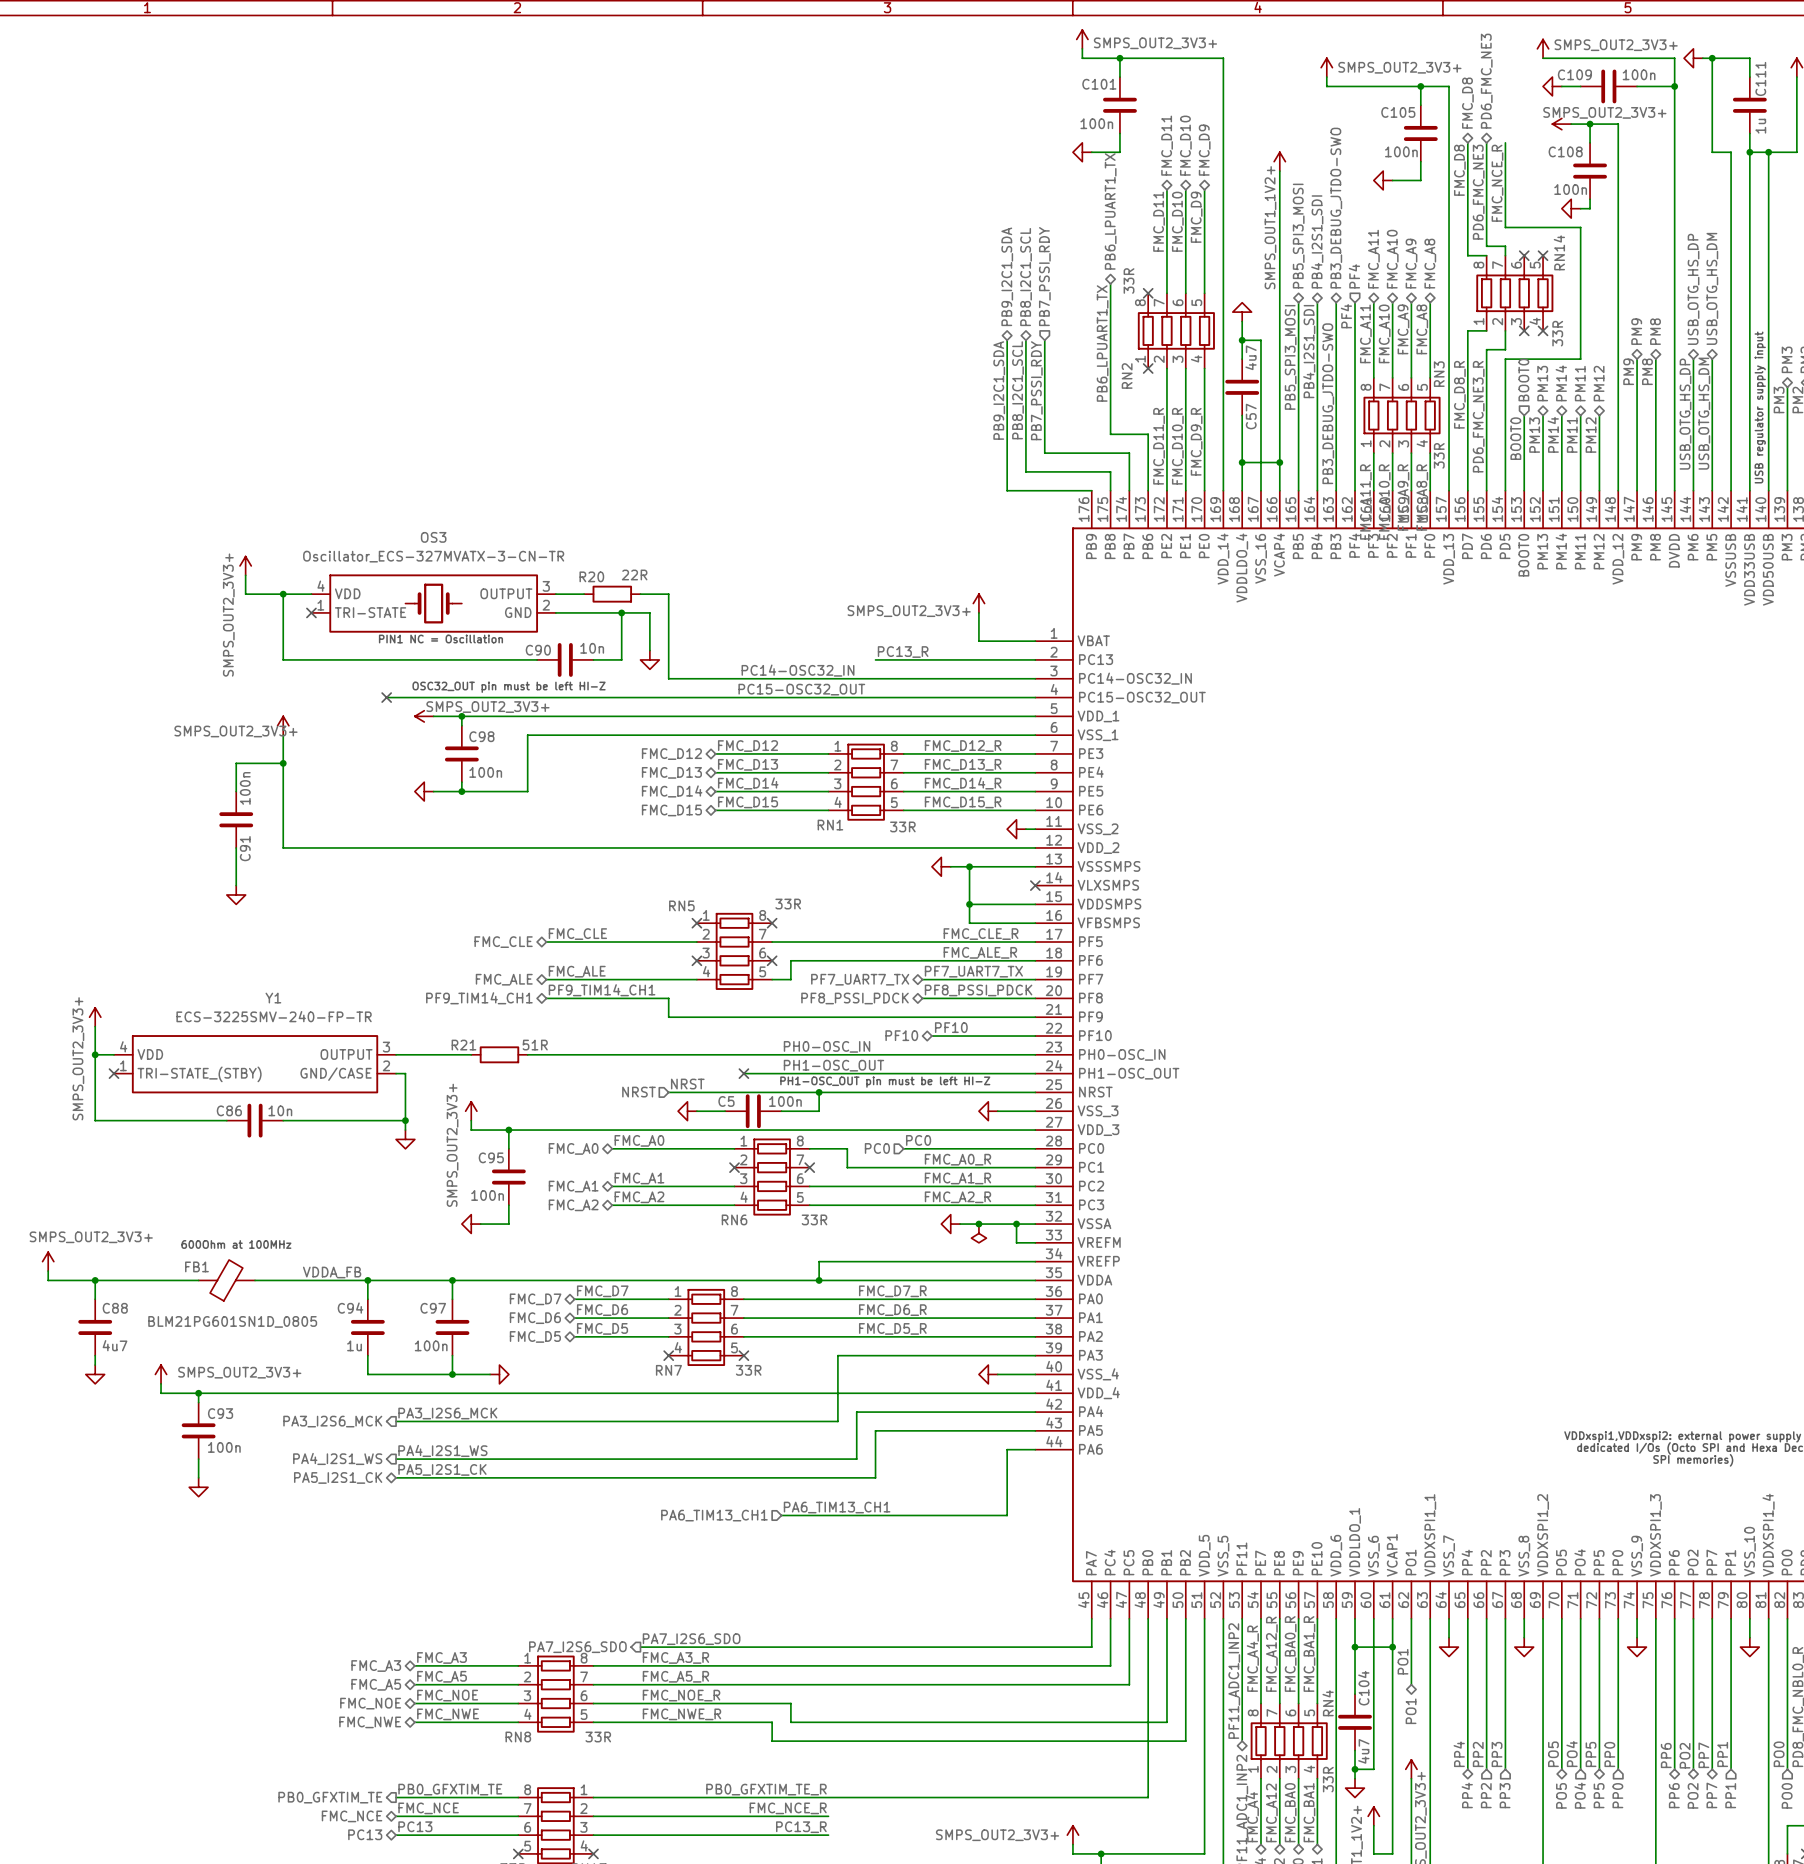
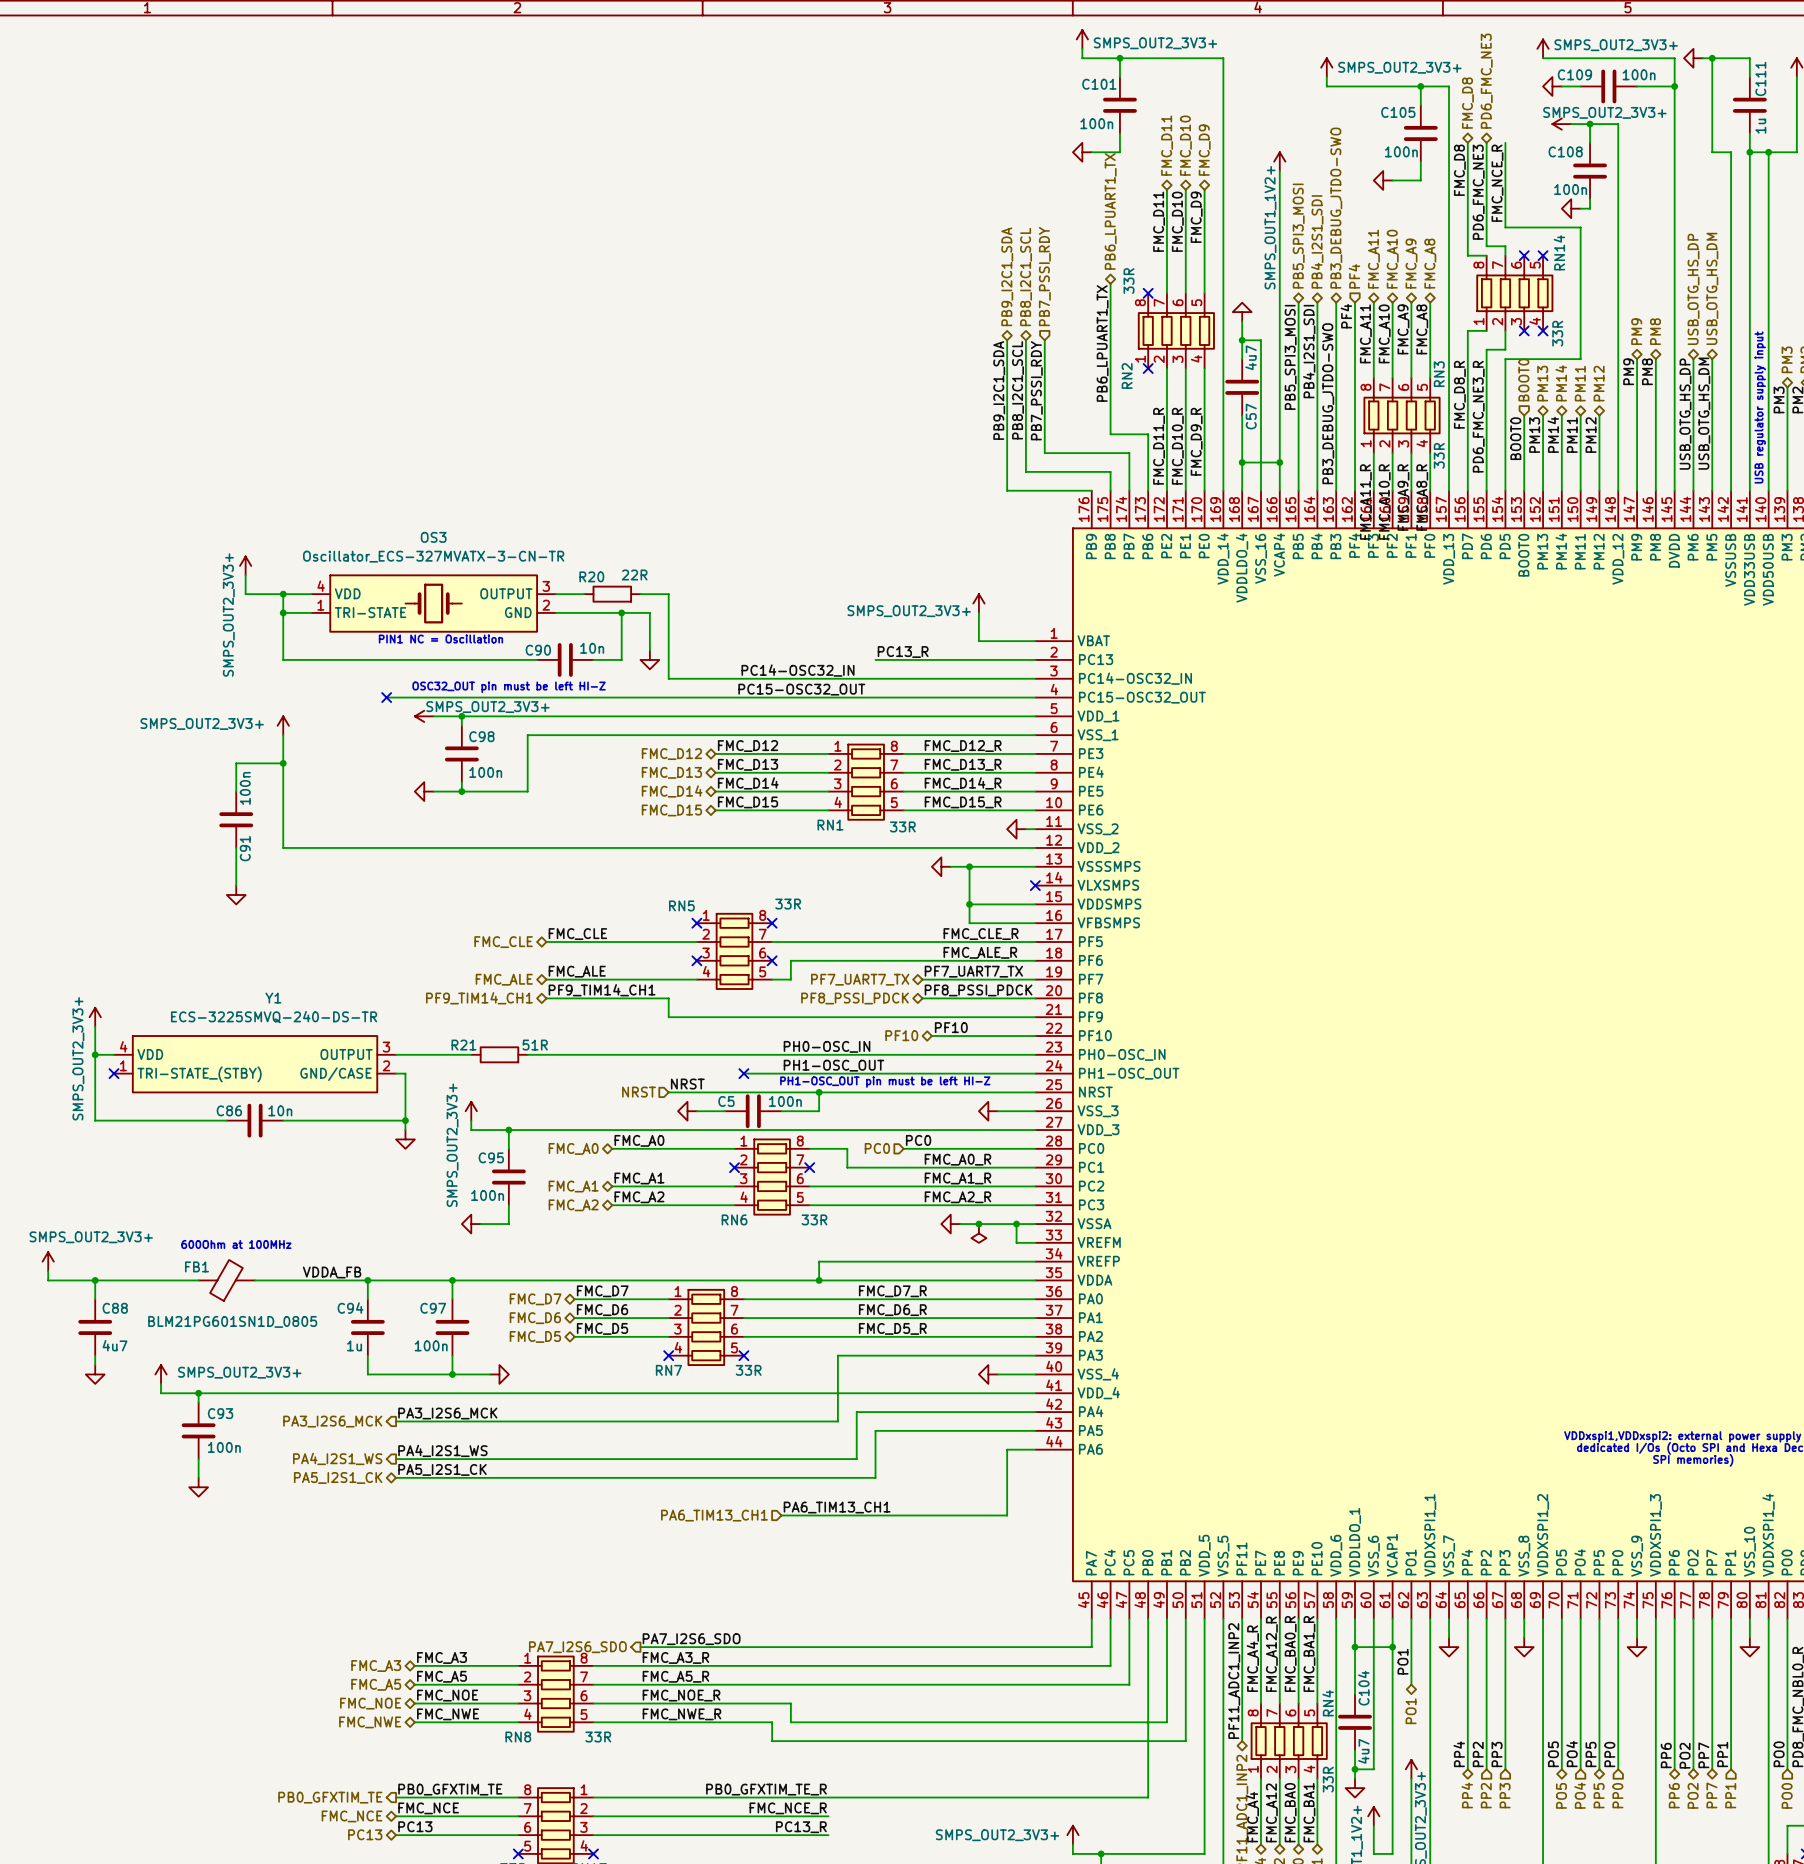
wire: none -> (283, 612) (311, 612)
junction: none -> (283, 612)
no-connect mark: (311, 612) -> none
power symbol text position: SMPS_OUT2_3V3+ (236, 731) -> SMPS_OUT2_3V3+ (202, 723)
Y1 value: ECS-3225SMV-240-FP-TR (274, 1016) -> ECS-3225SMVQ-240-DS-TR (274, 1017)

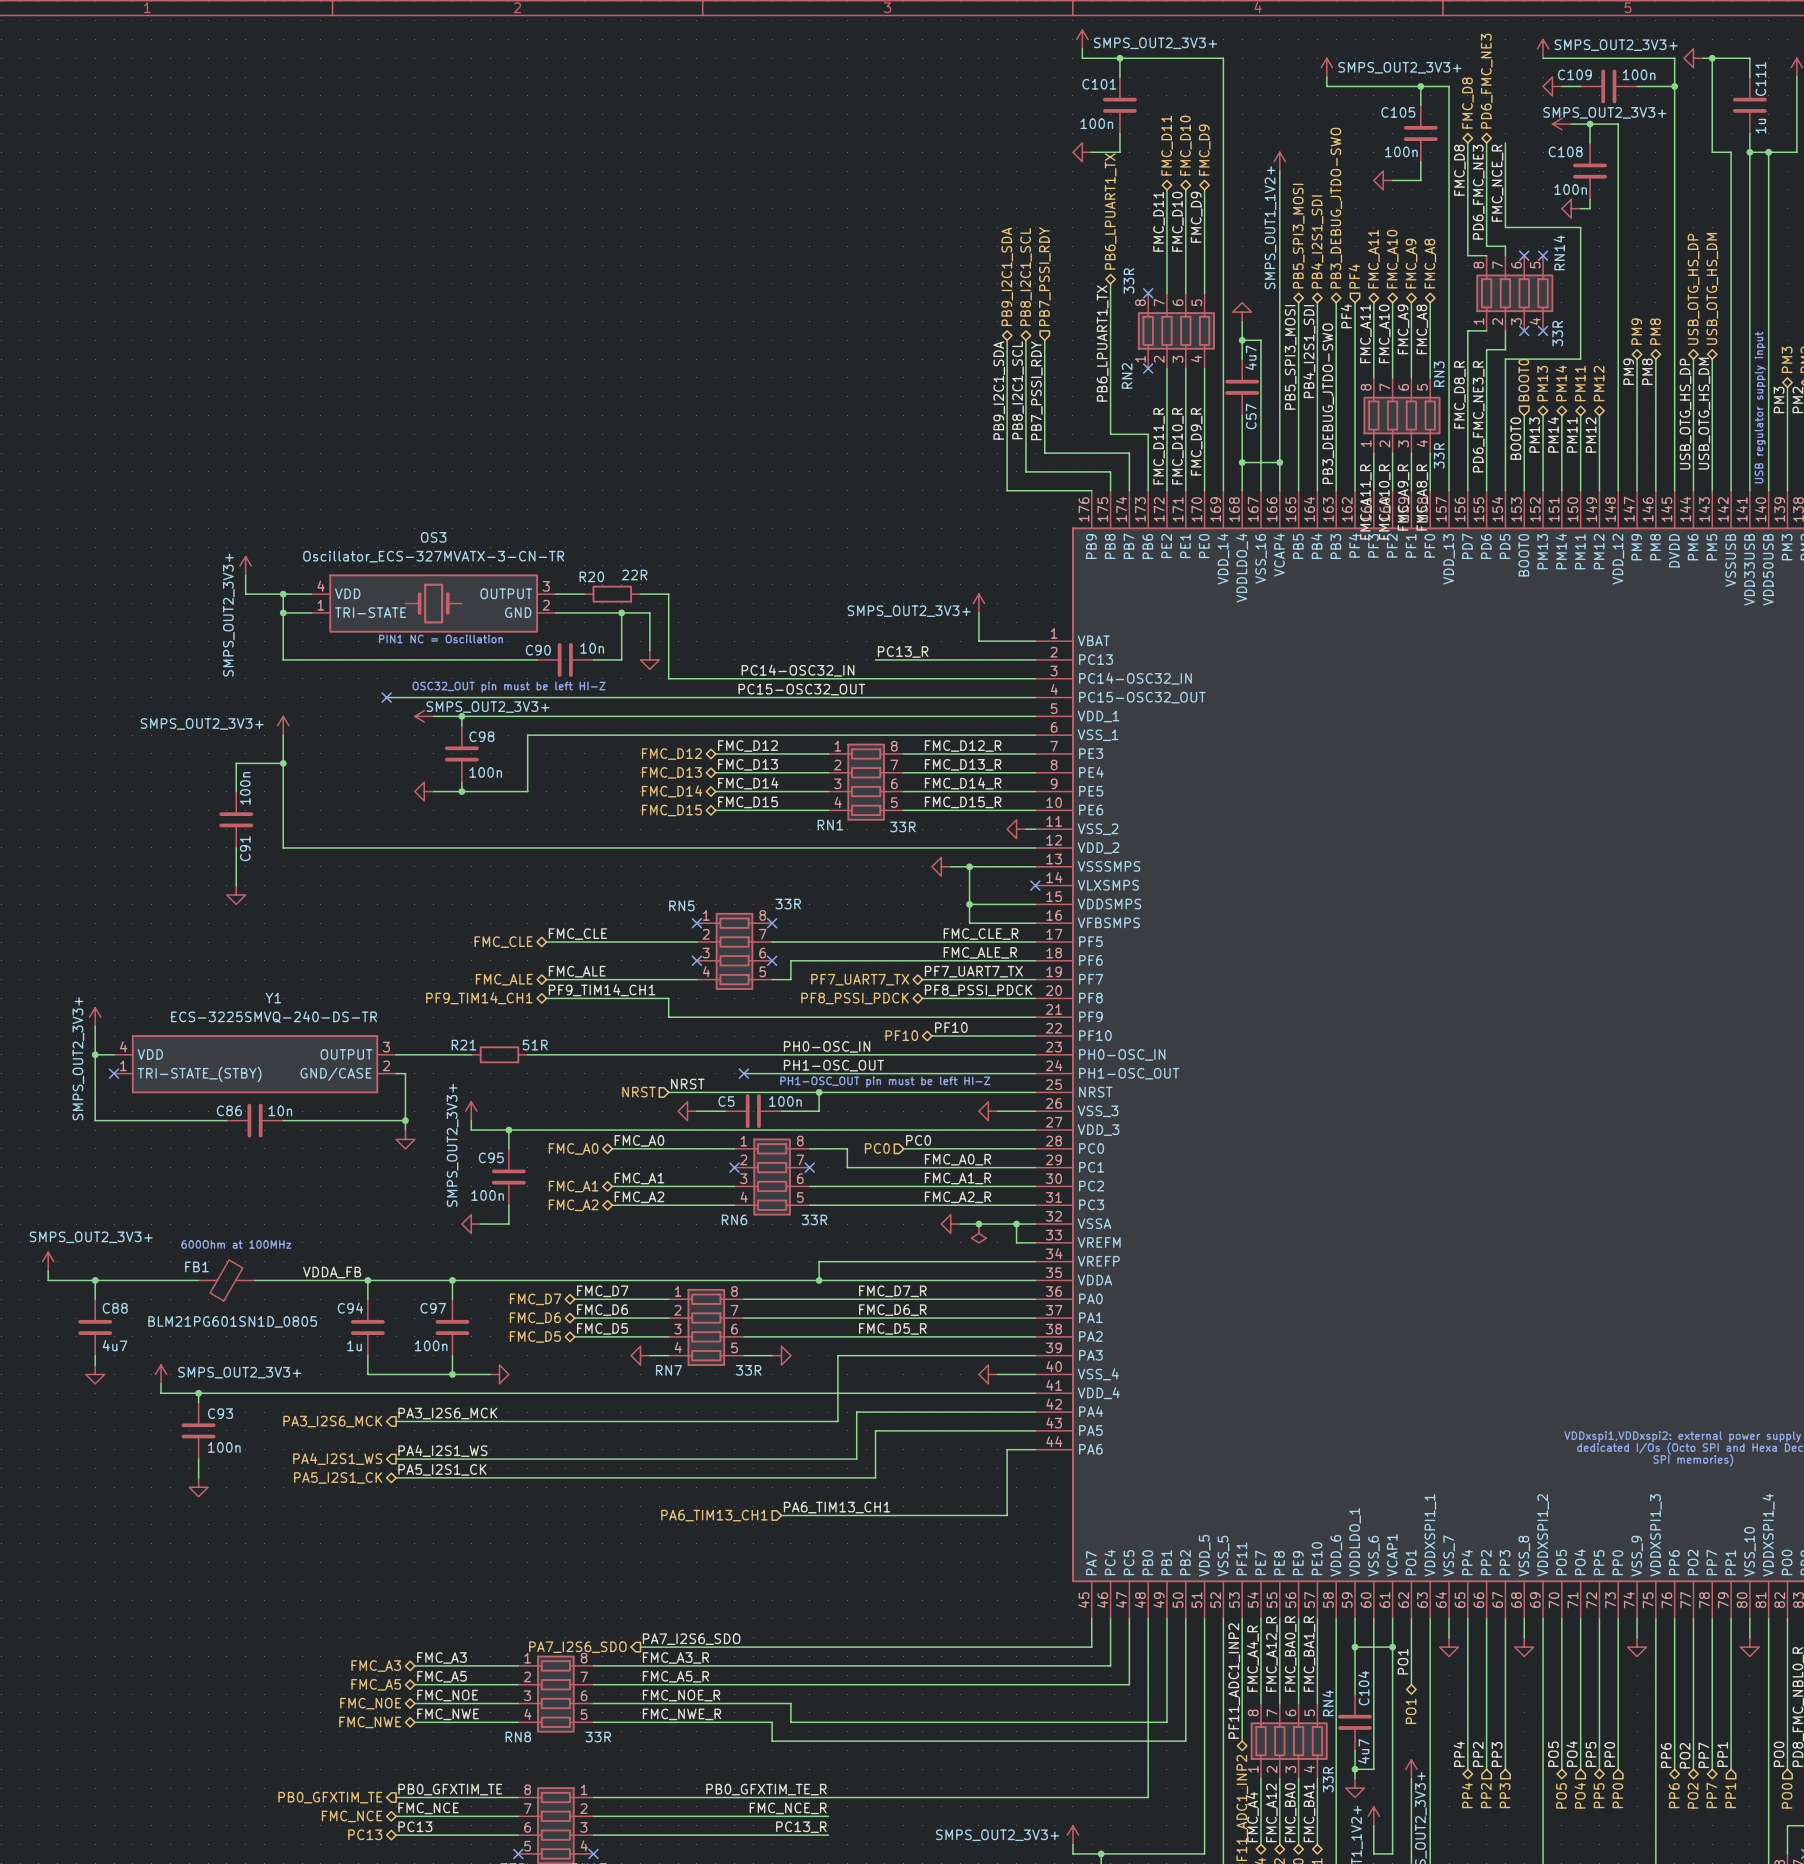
power symbol: none -> (640, 1355)
wire: none -> (649, 1355) (668, 1355)
no-connect mark: (668, 1355) -> none
wire: none -> (743, 1355) (772, 1355)
no-connect mark: (743, 1355) -> none
power symbol: none -> (781, 1355)

